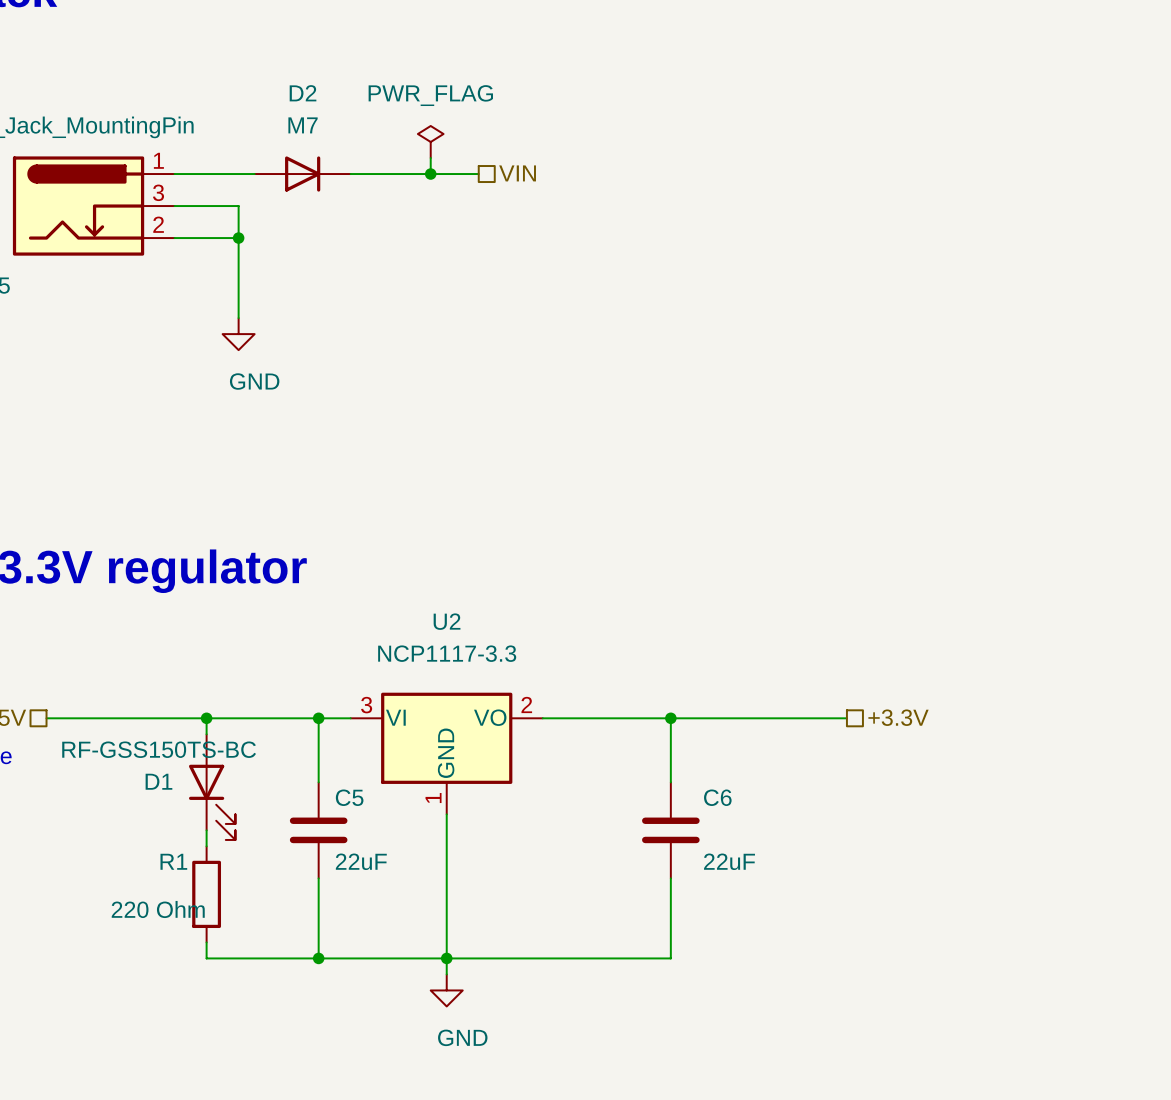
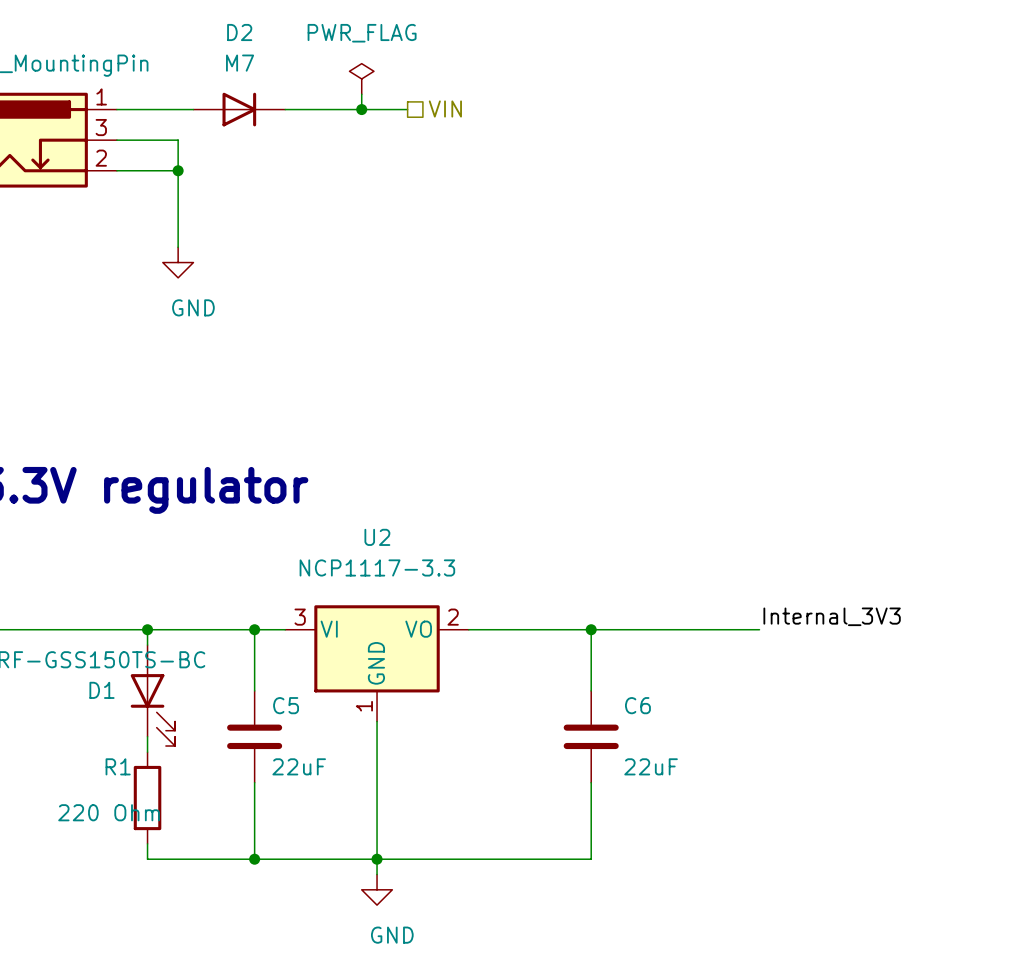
label: none -> Internal_3V3 (832, 616)
hierarchical label: +3.3V (898, 717) -> none

